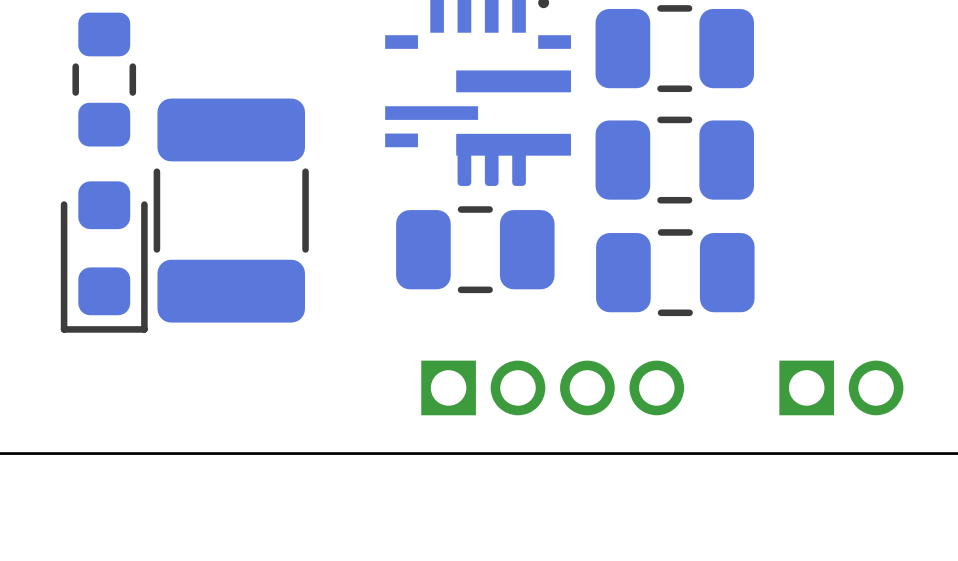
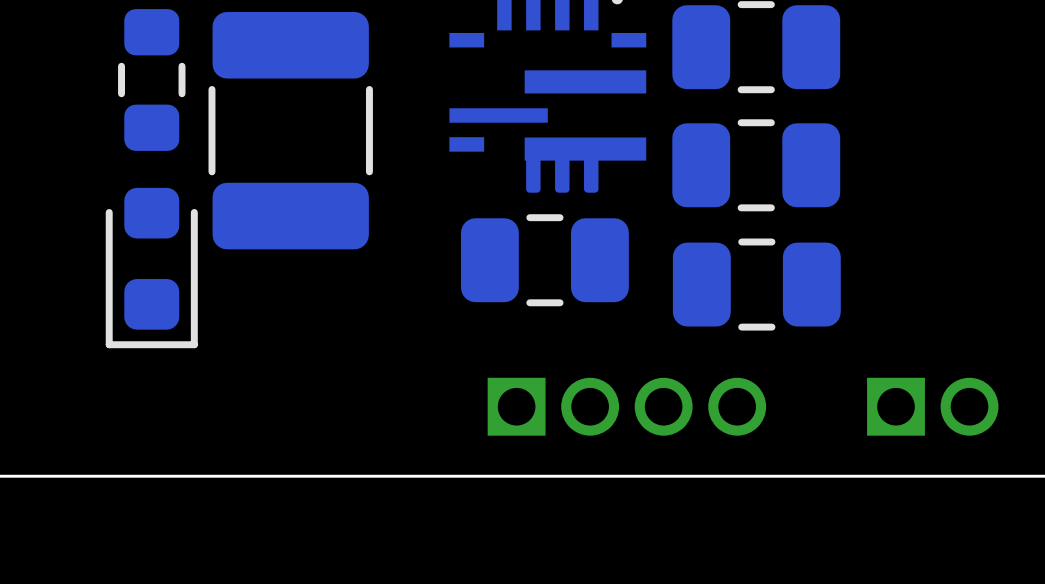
part position: (231, 210) -> (290, 130)

